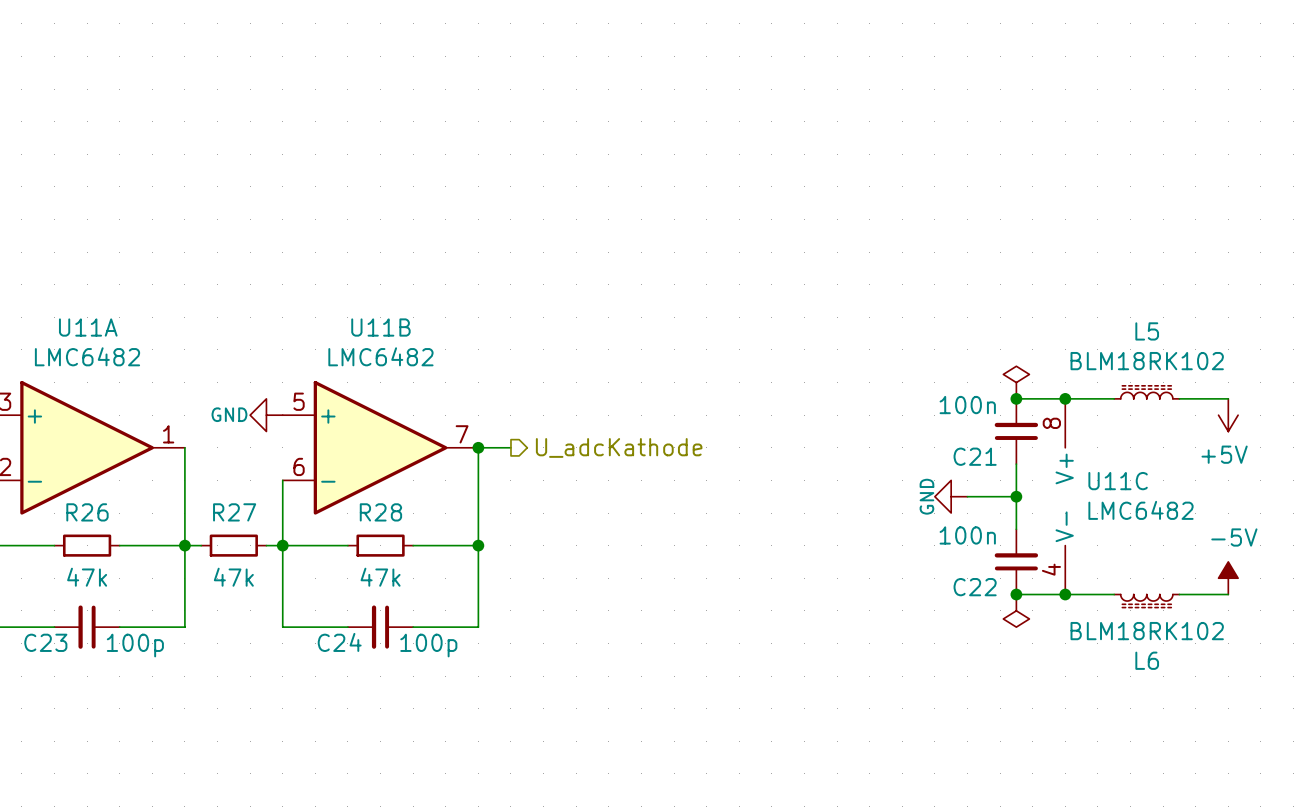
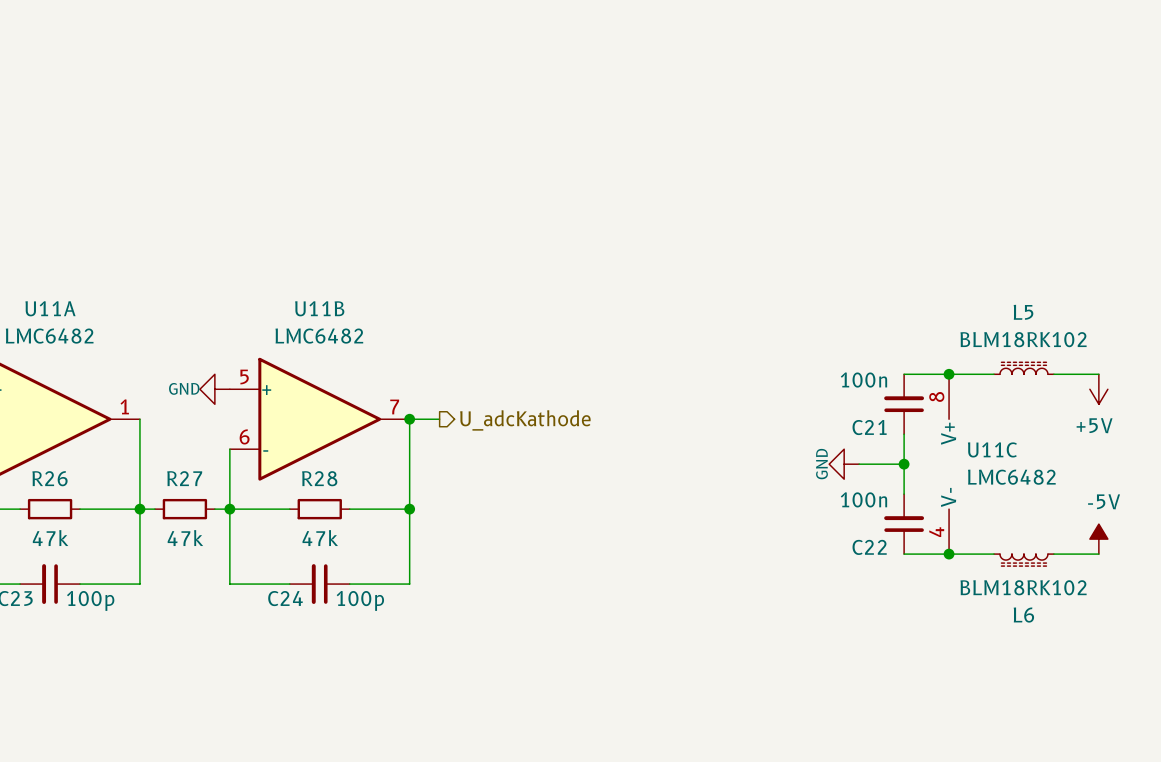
power symbol: (1016, 382) -> none
junction: (1016, 398) -> none
junction: (1016, 594) -> none
power symbol: (1016, 610) -> none

